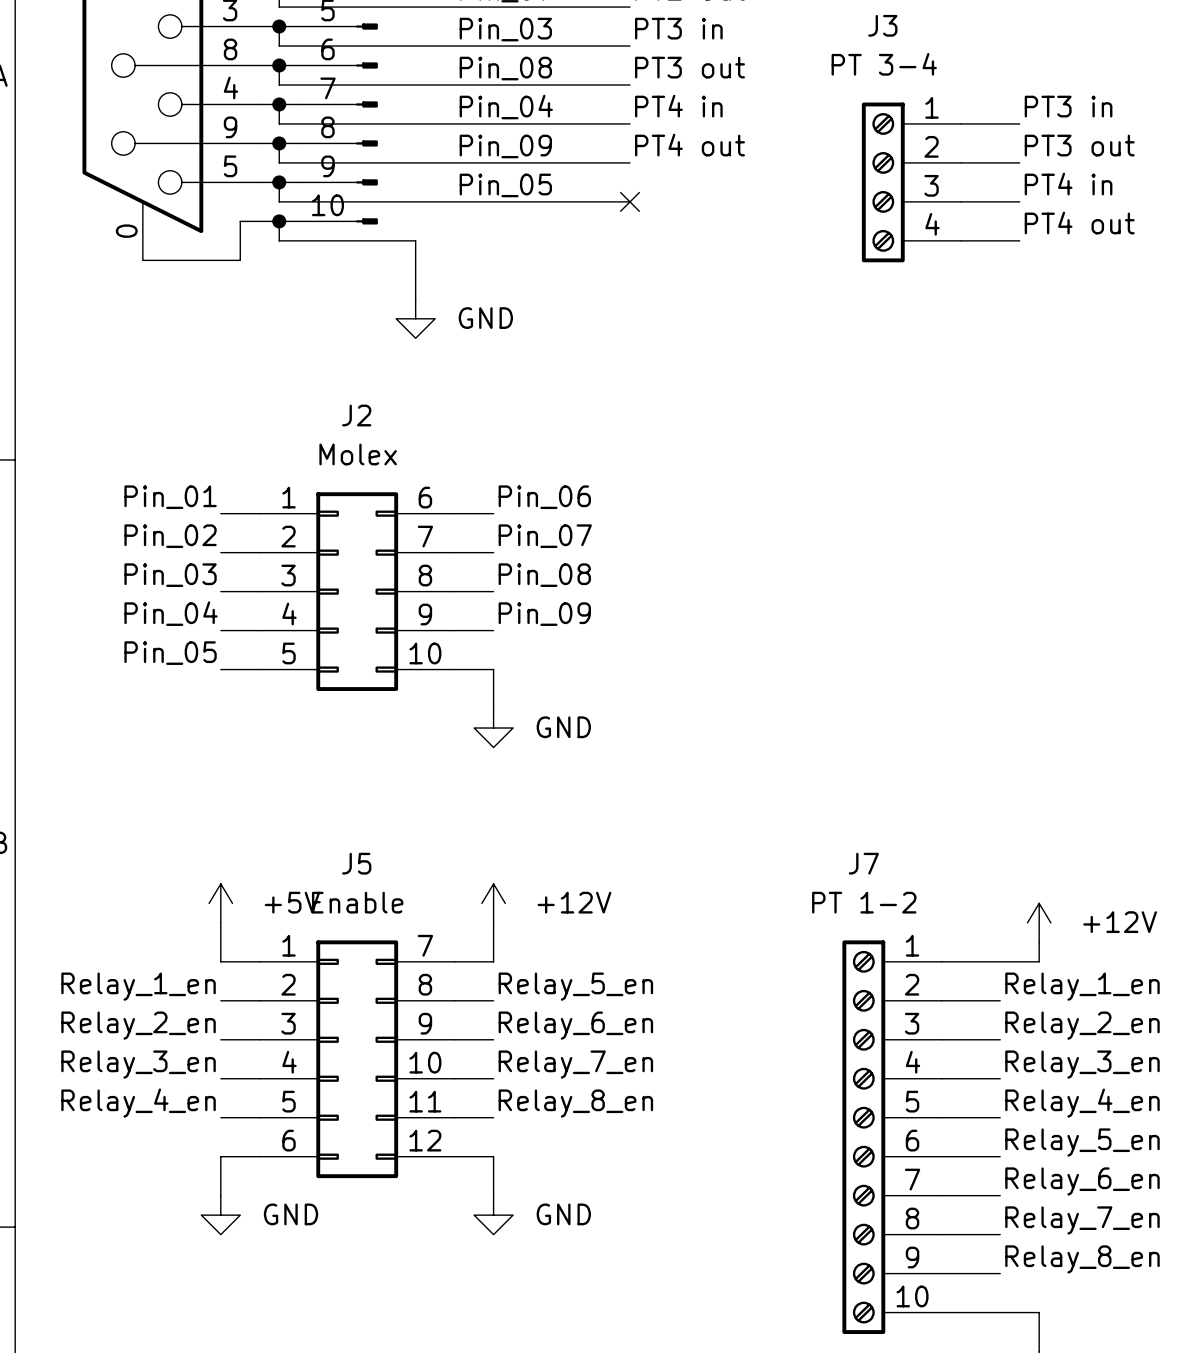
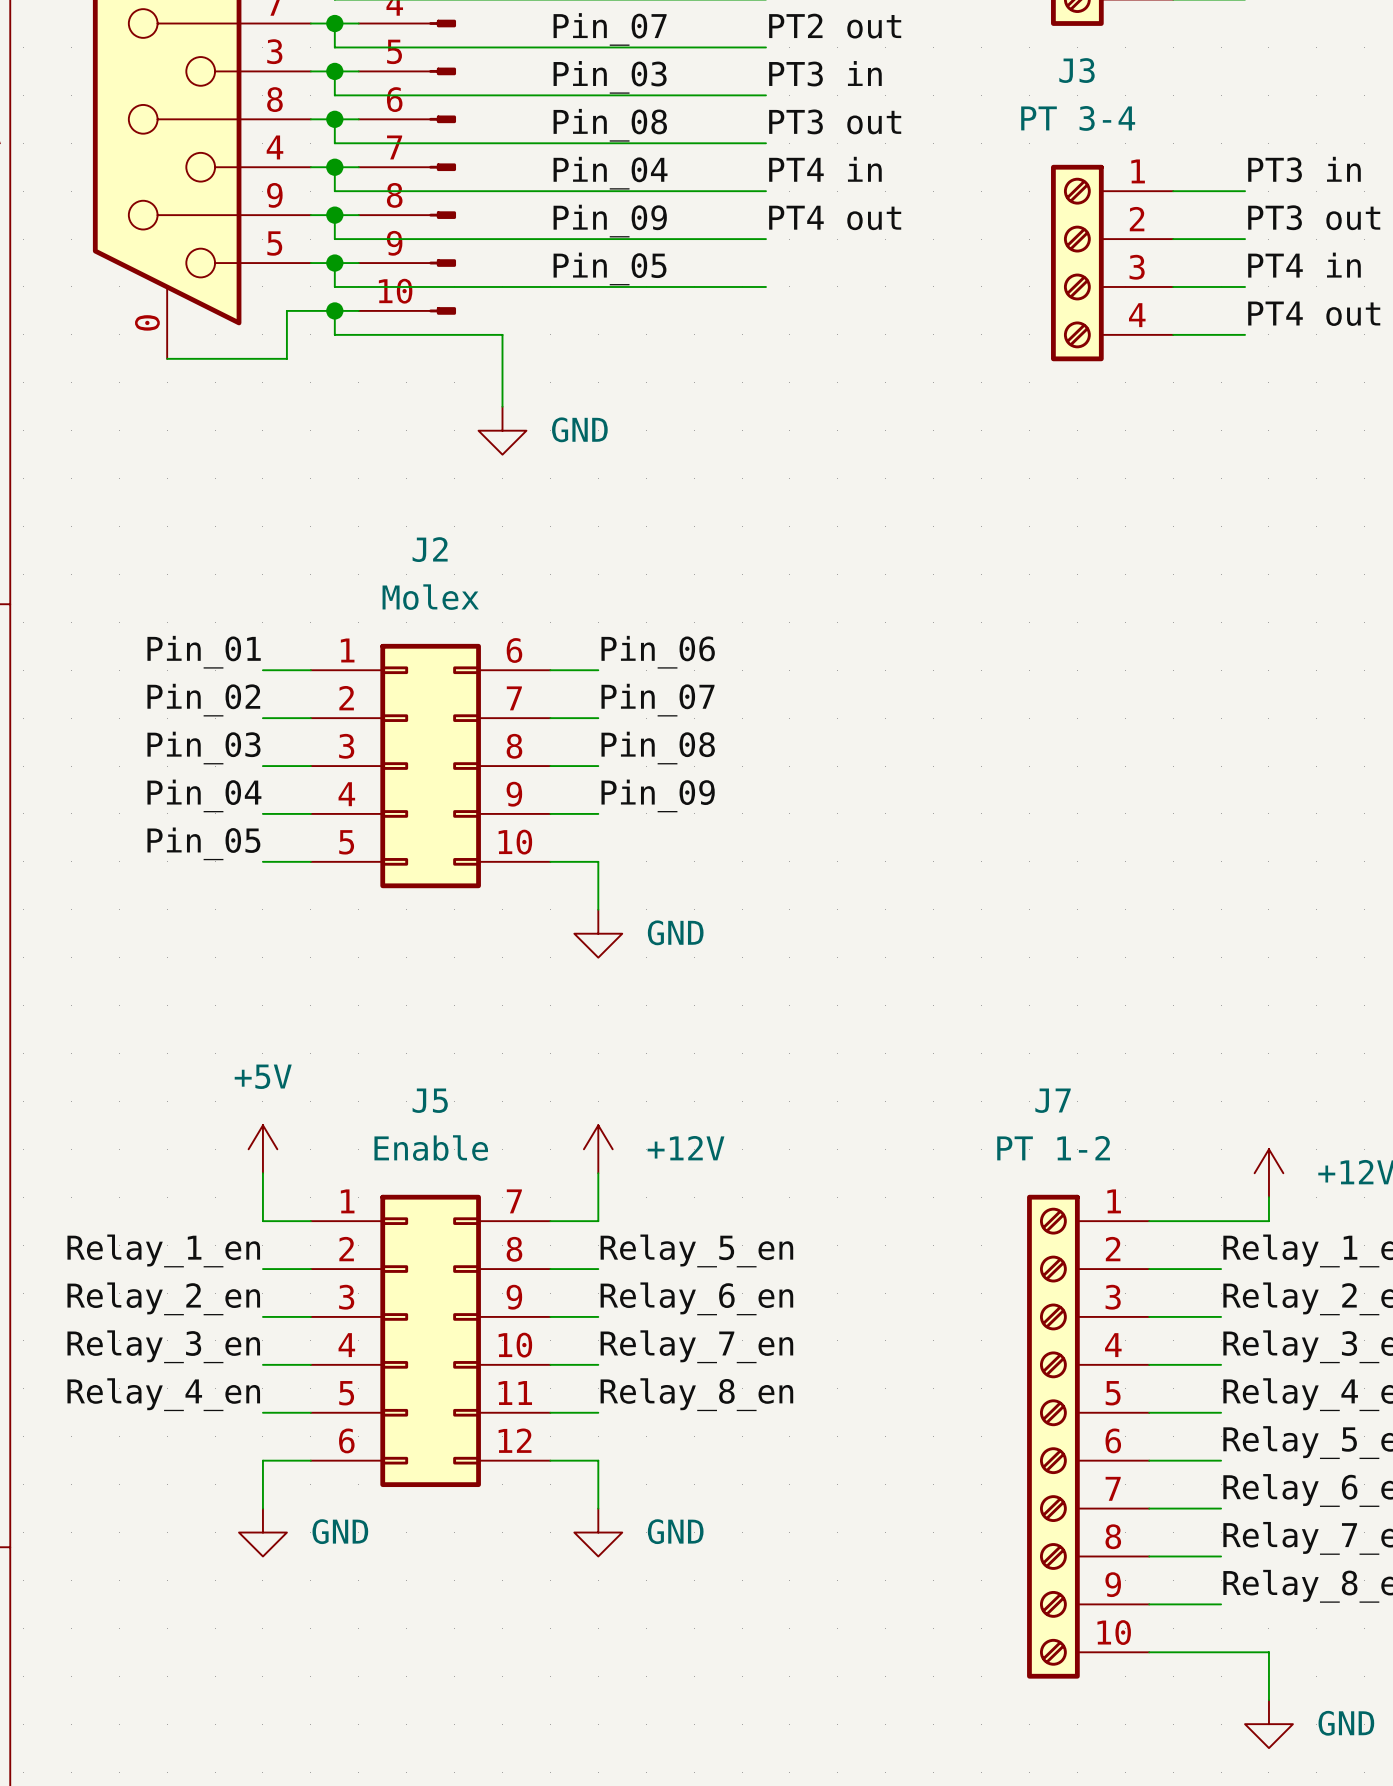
no-connect mark: (629, 201) -> none
power symbol text position: +5V (292, 902) -> +5V (263, 1076)

